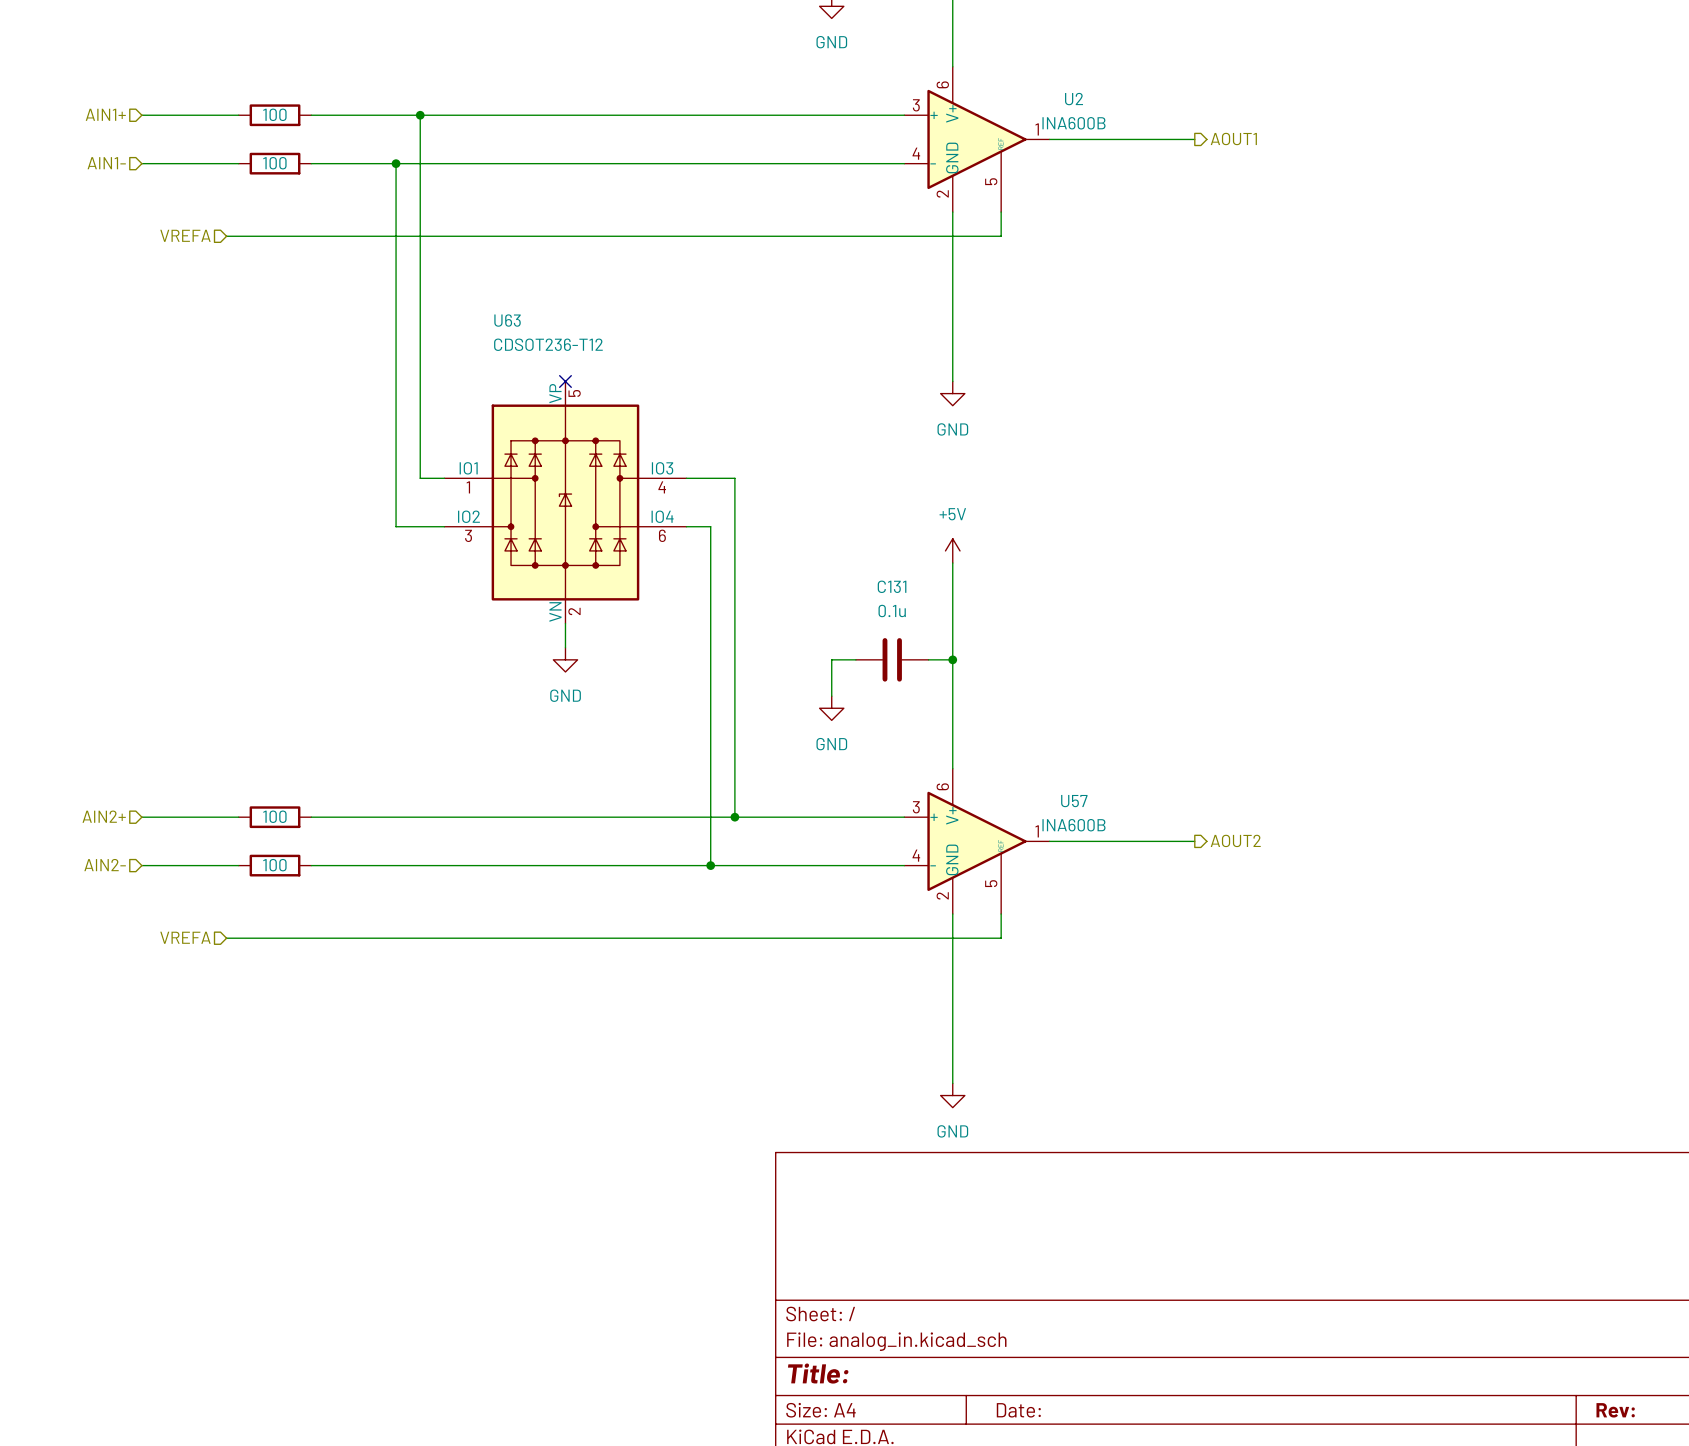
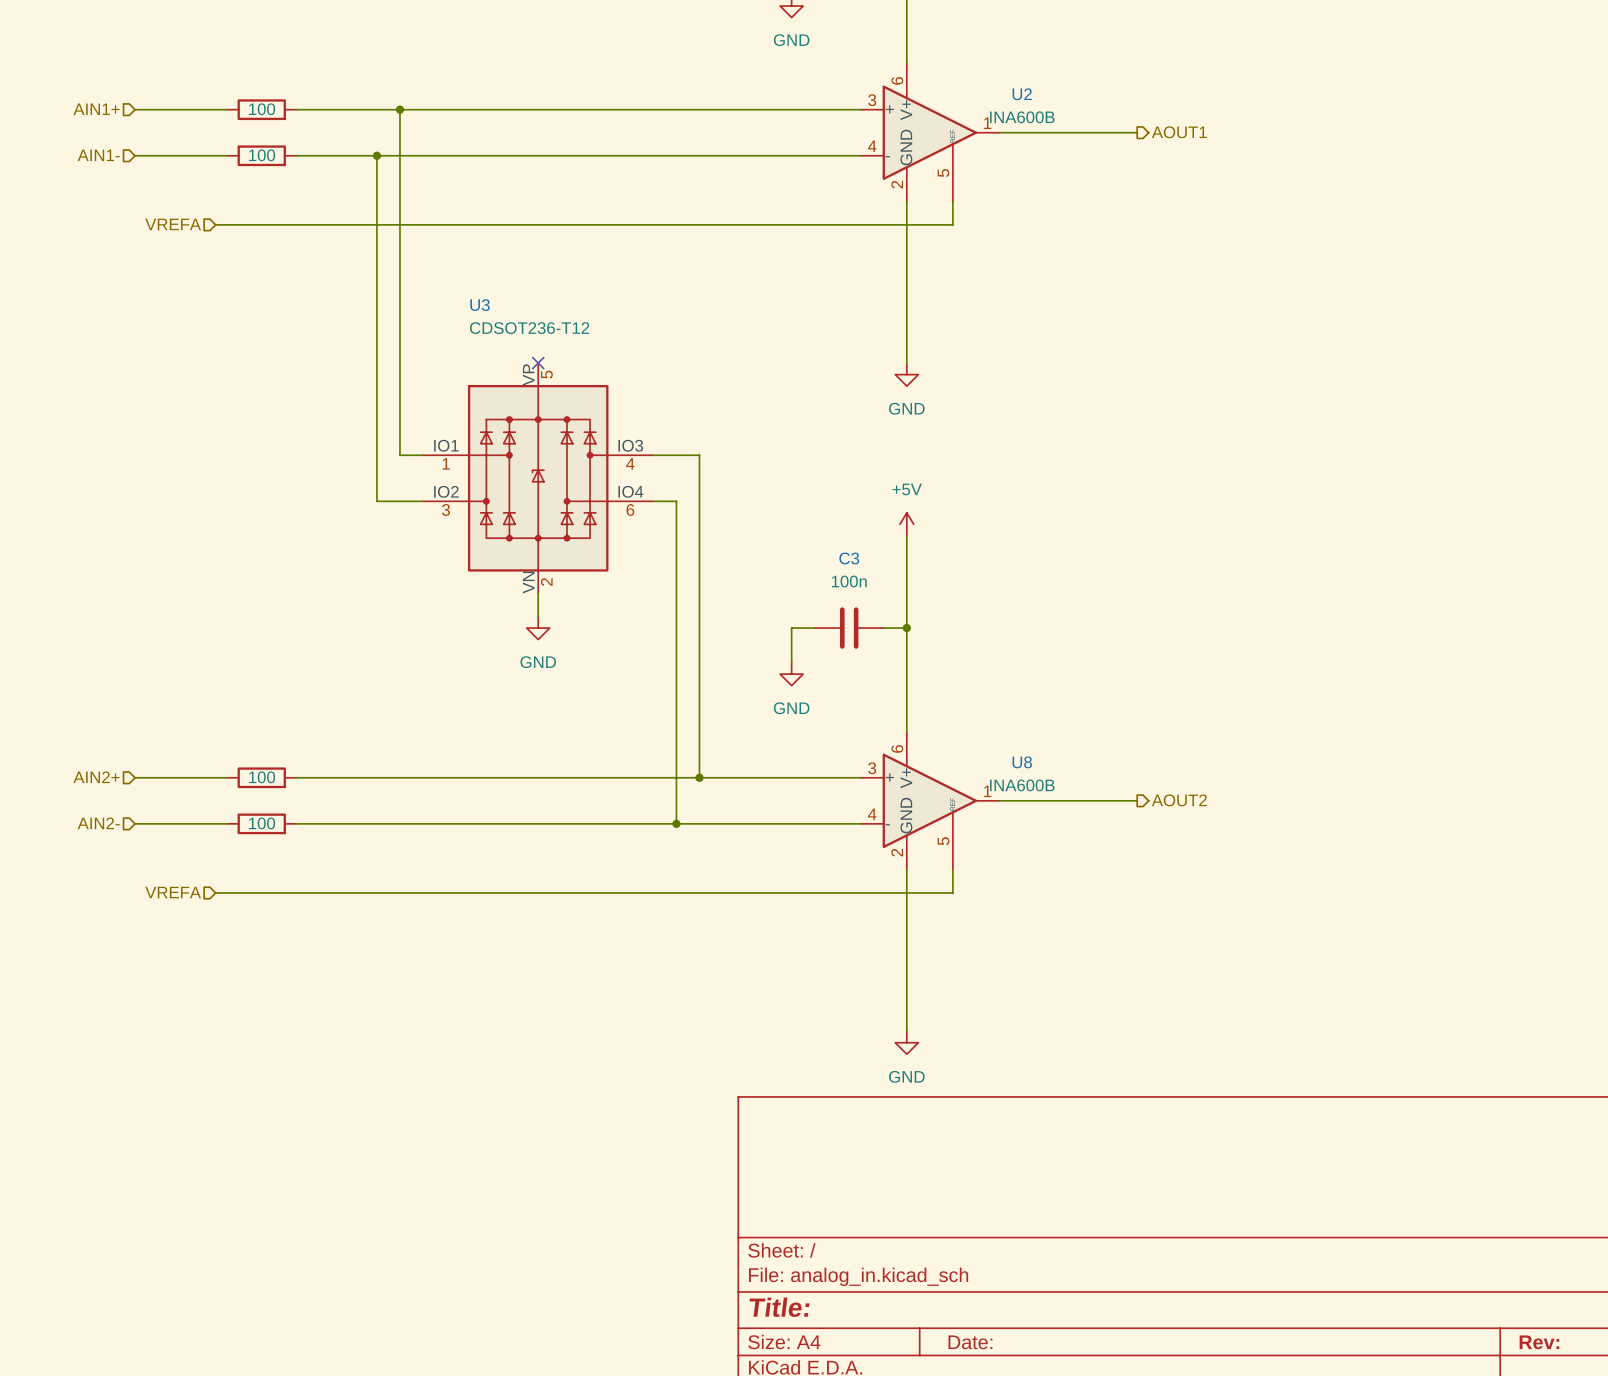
U63 name: U63 (507, 320) -> U3 (480, 305)
C131 name: C131 (892, 586) -> C3 (849, 558)
C131 value: 0.1u (892, 611) -> 100n (849, 581)
U57 name: U57 (1074, 801) -> U8 (1022, 762)

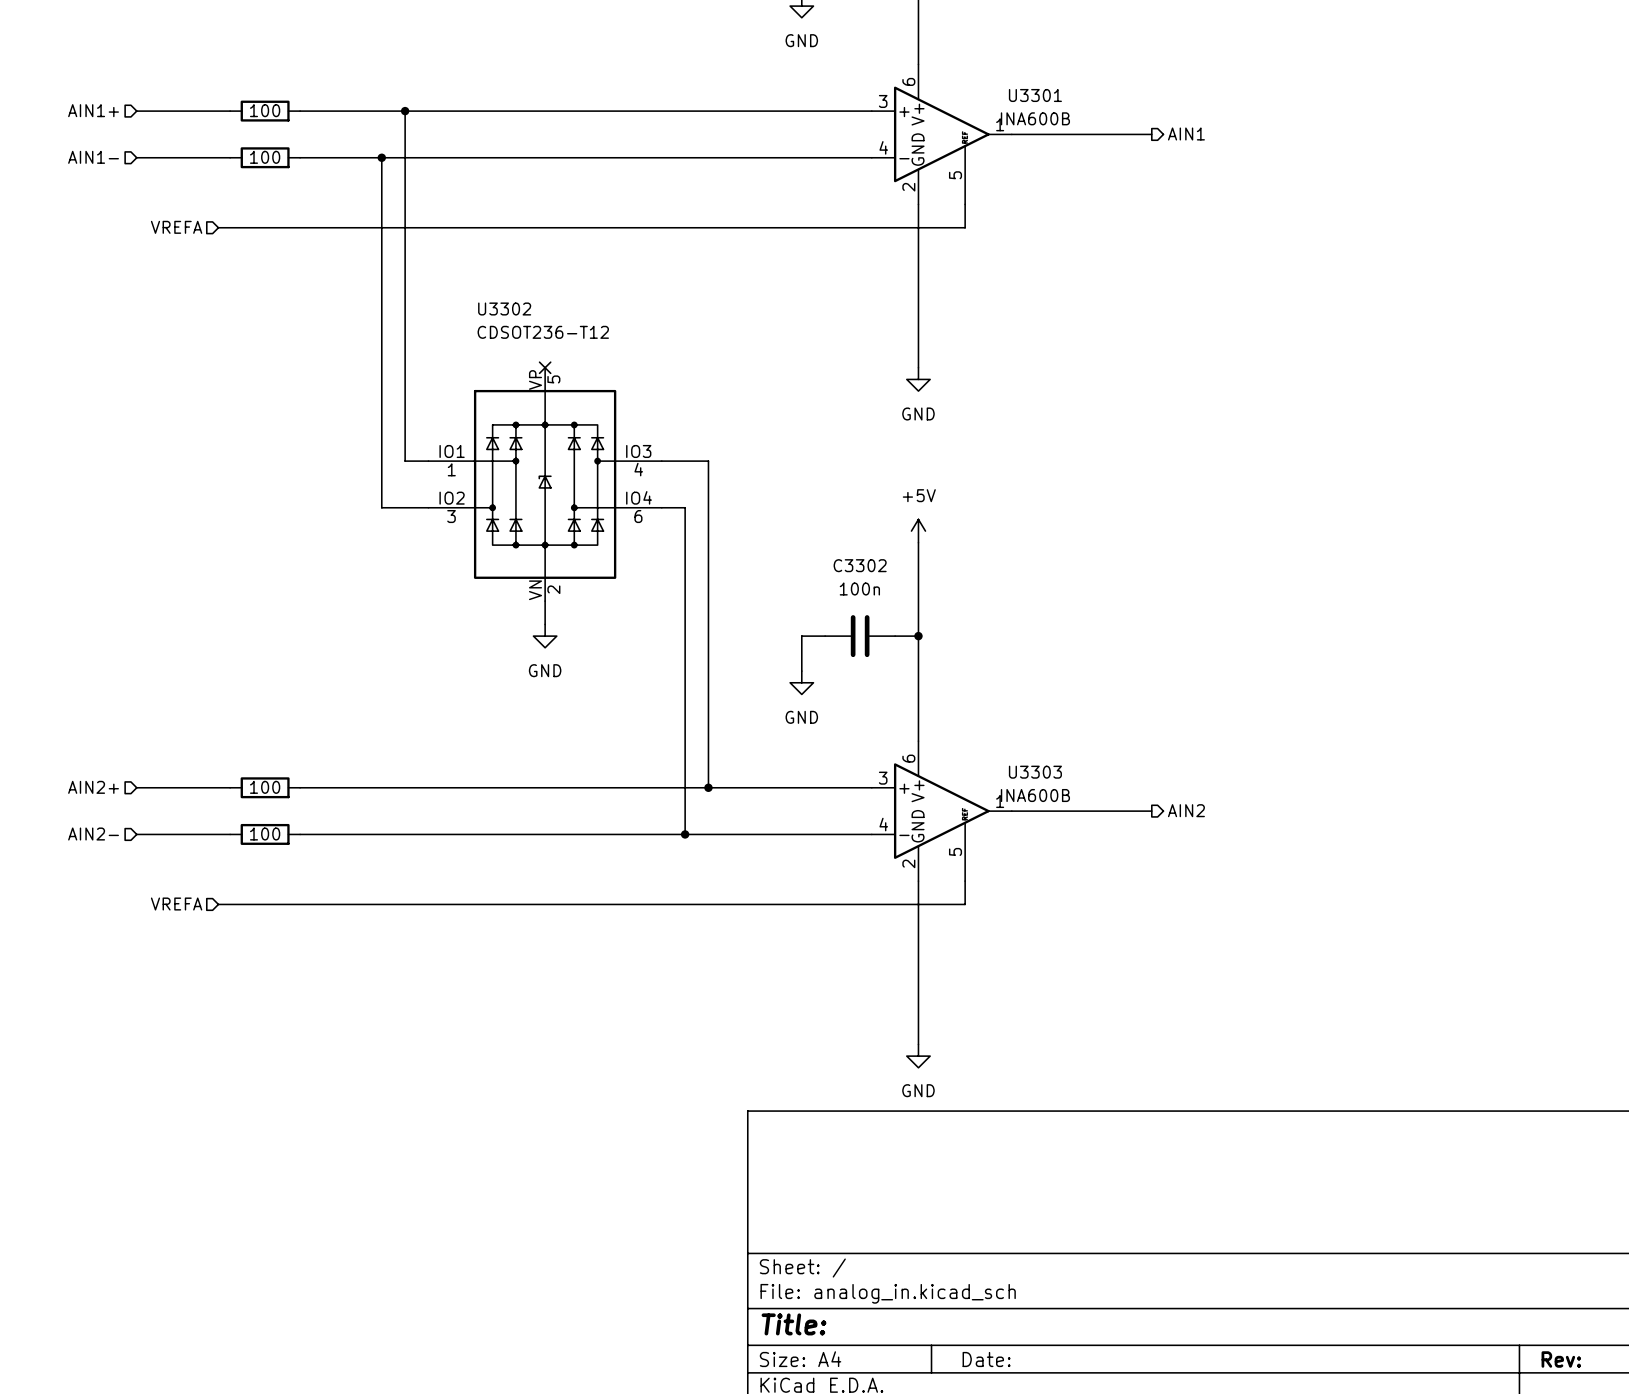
U2 name: U2 (1022, 94) -> U3301 (1035, 95)
hierarchical label: AOUT1 (1179, 132) -> AIN1 (1186, 133)
U3 name: U3 (480, 305) -> U3302 (504, 309)
C3 name: C3 (849, 558) -> C3302 (860, 565)
U8 name: U8 (1022, 762) -> U3303 (1035, 772)
hierarchical label: AOUT2 (1179, 800) -> AIN2 (1186, 810)

